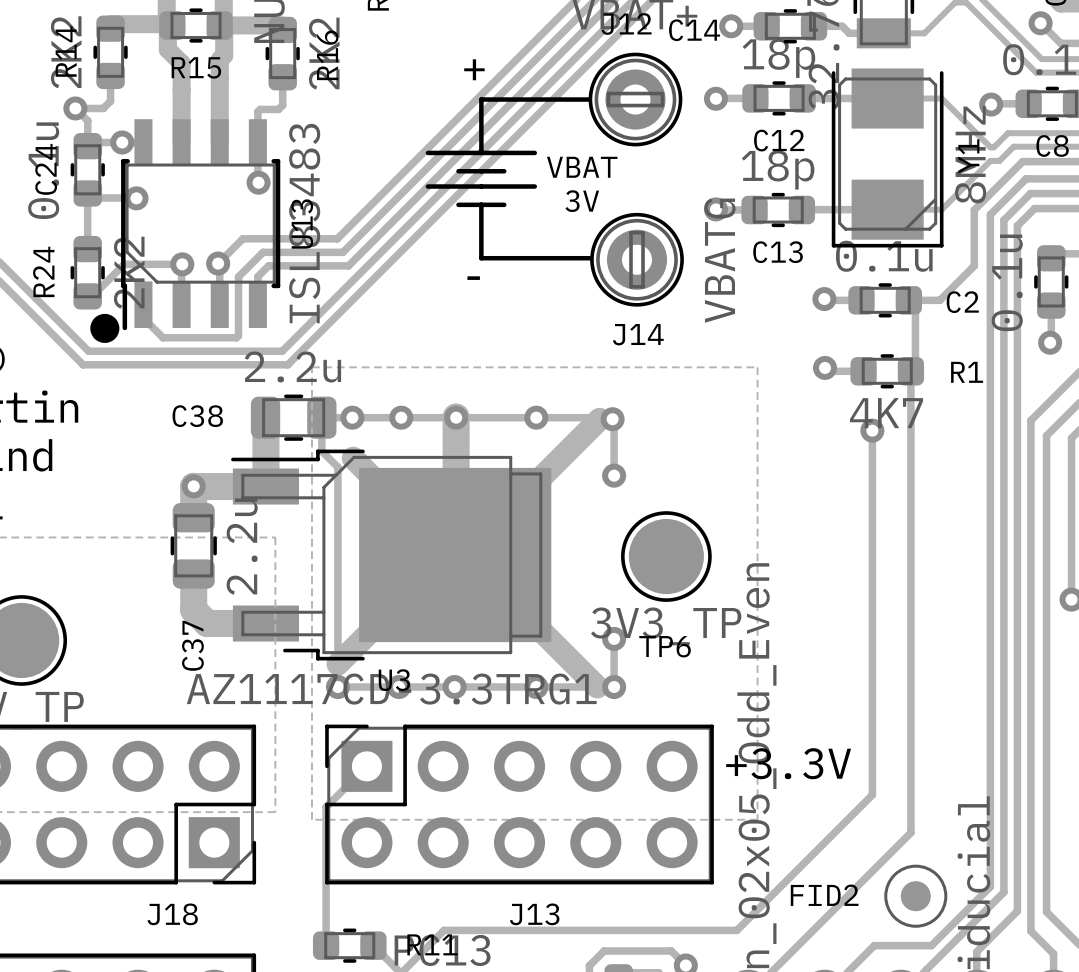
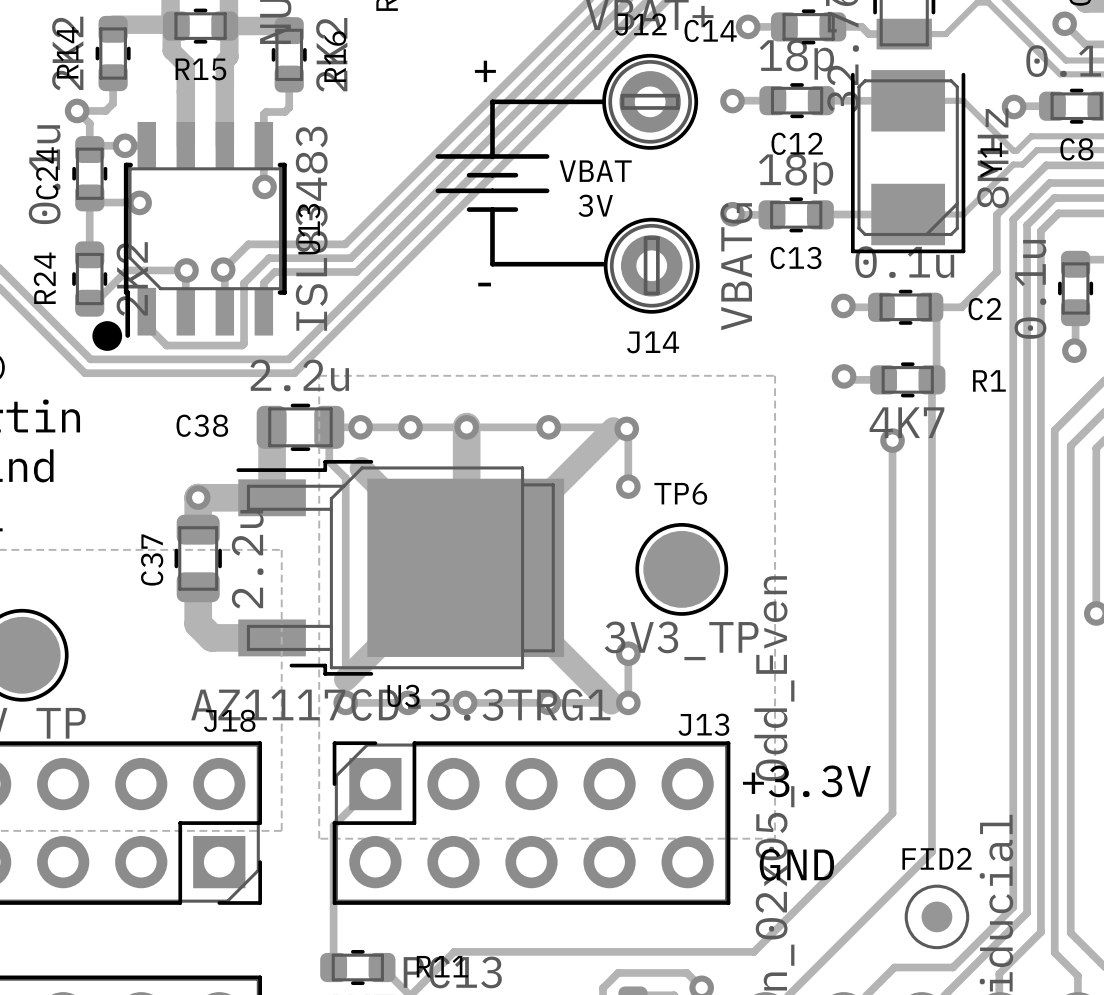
C37 name position: C37 (192, 645) -> C37 (152, 560)
TP6 name position: TP6 (665, 646) -> TP6 (680, 493)
text: none -> GND (796, 864)
FID2 name position: FID2 (824, 895) -> FID2 (937, 858)
J18 name position: J18 (172, 914) -> J18 (229, 720)
J13 name position: J13 (534, 914) -> J13 (703, 724)

